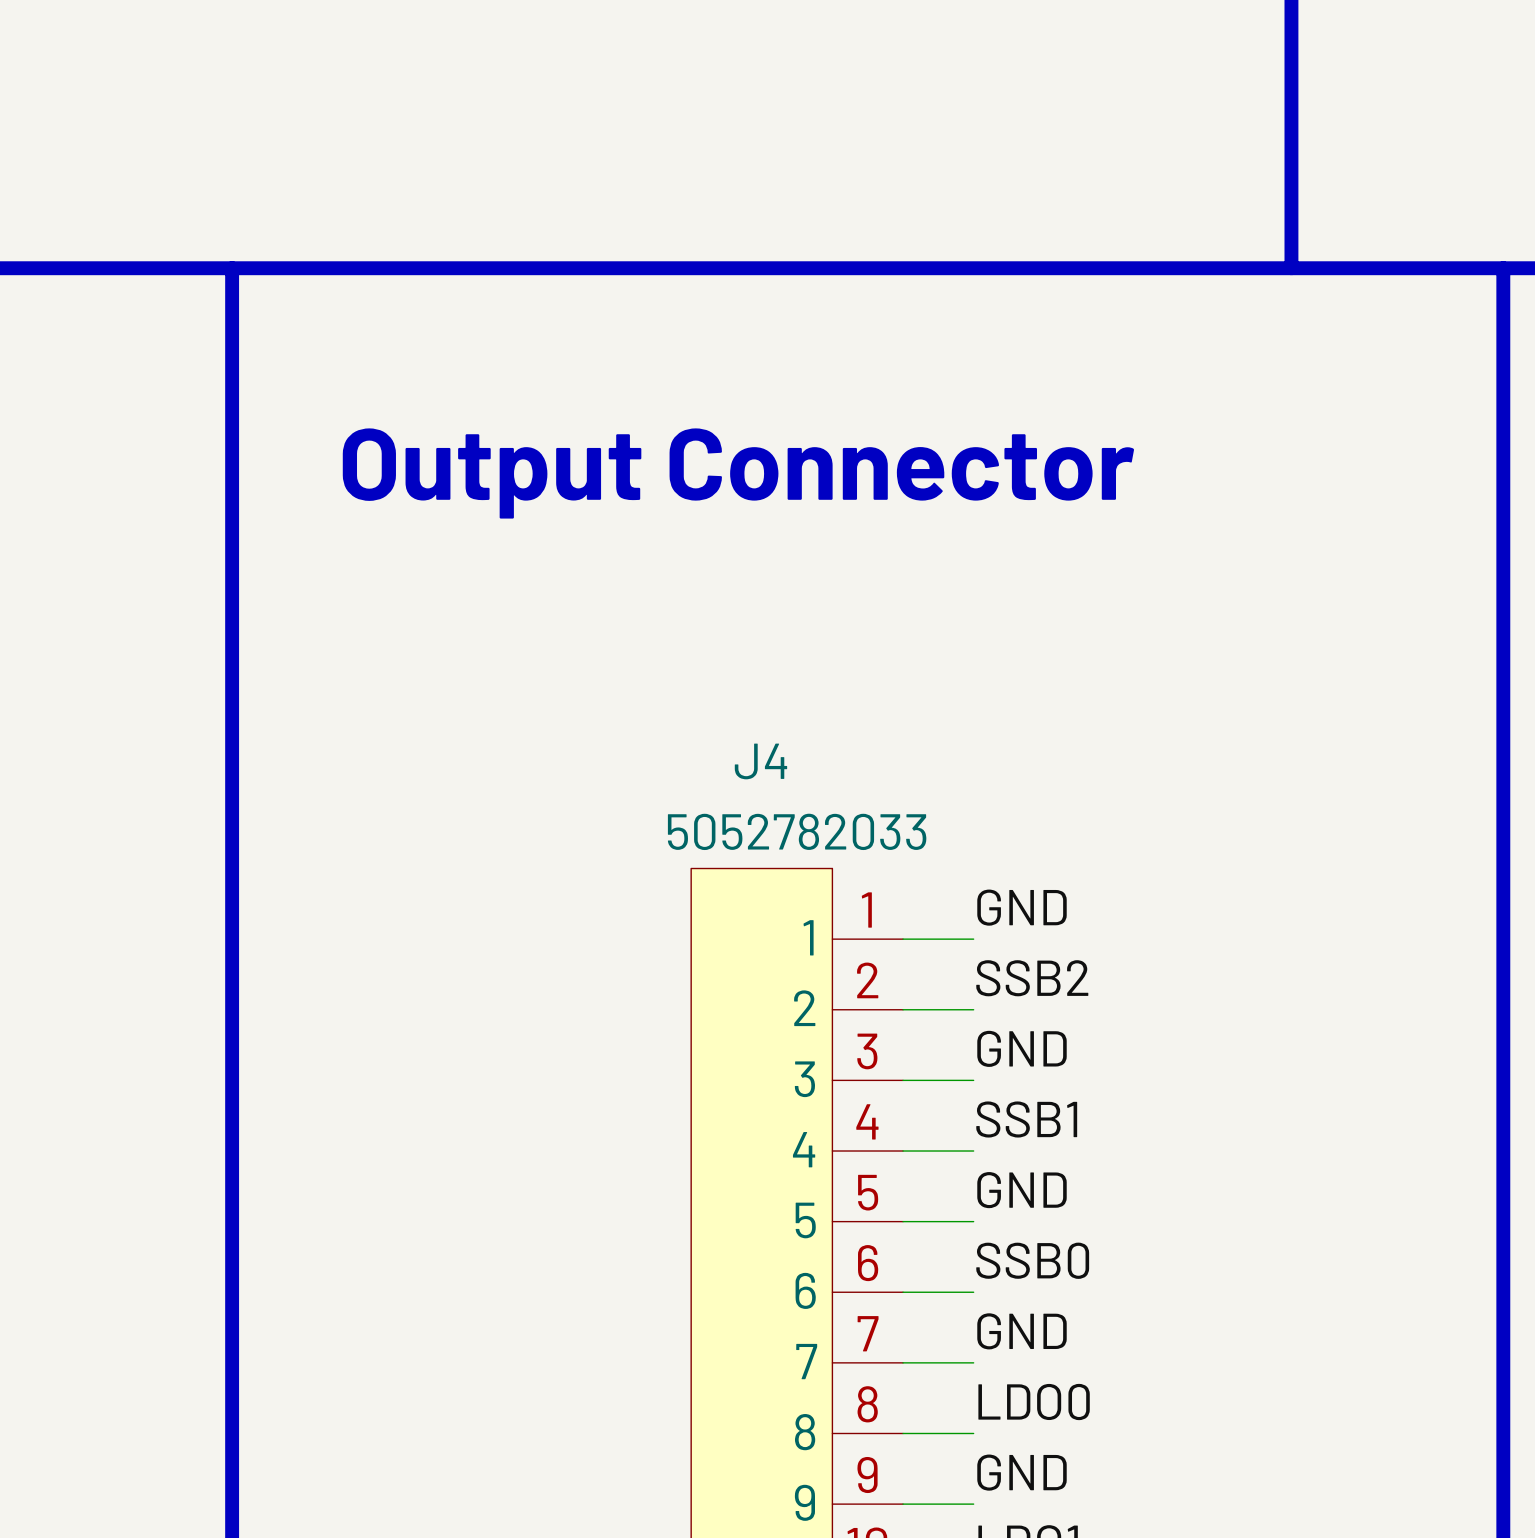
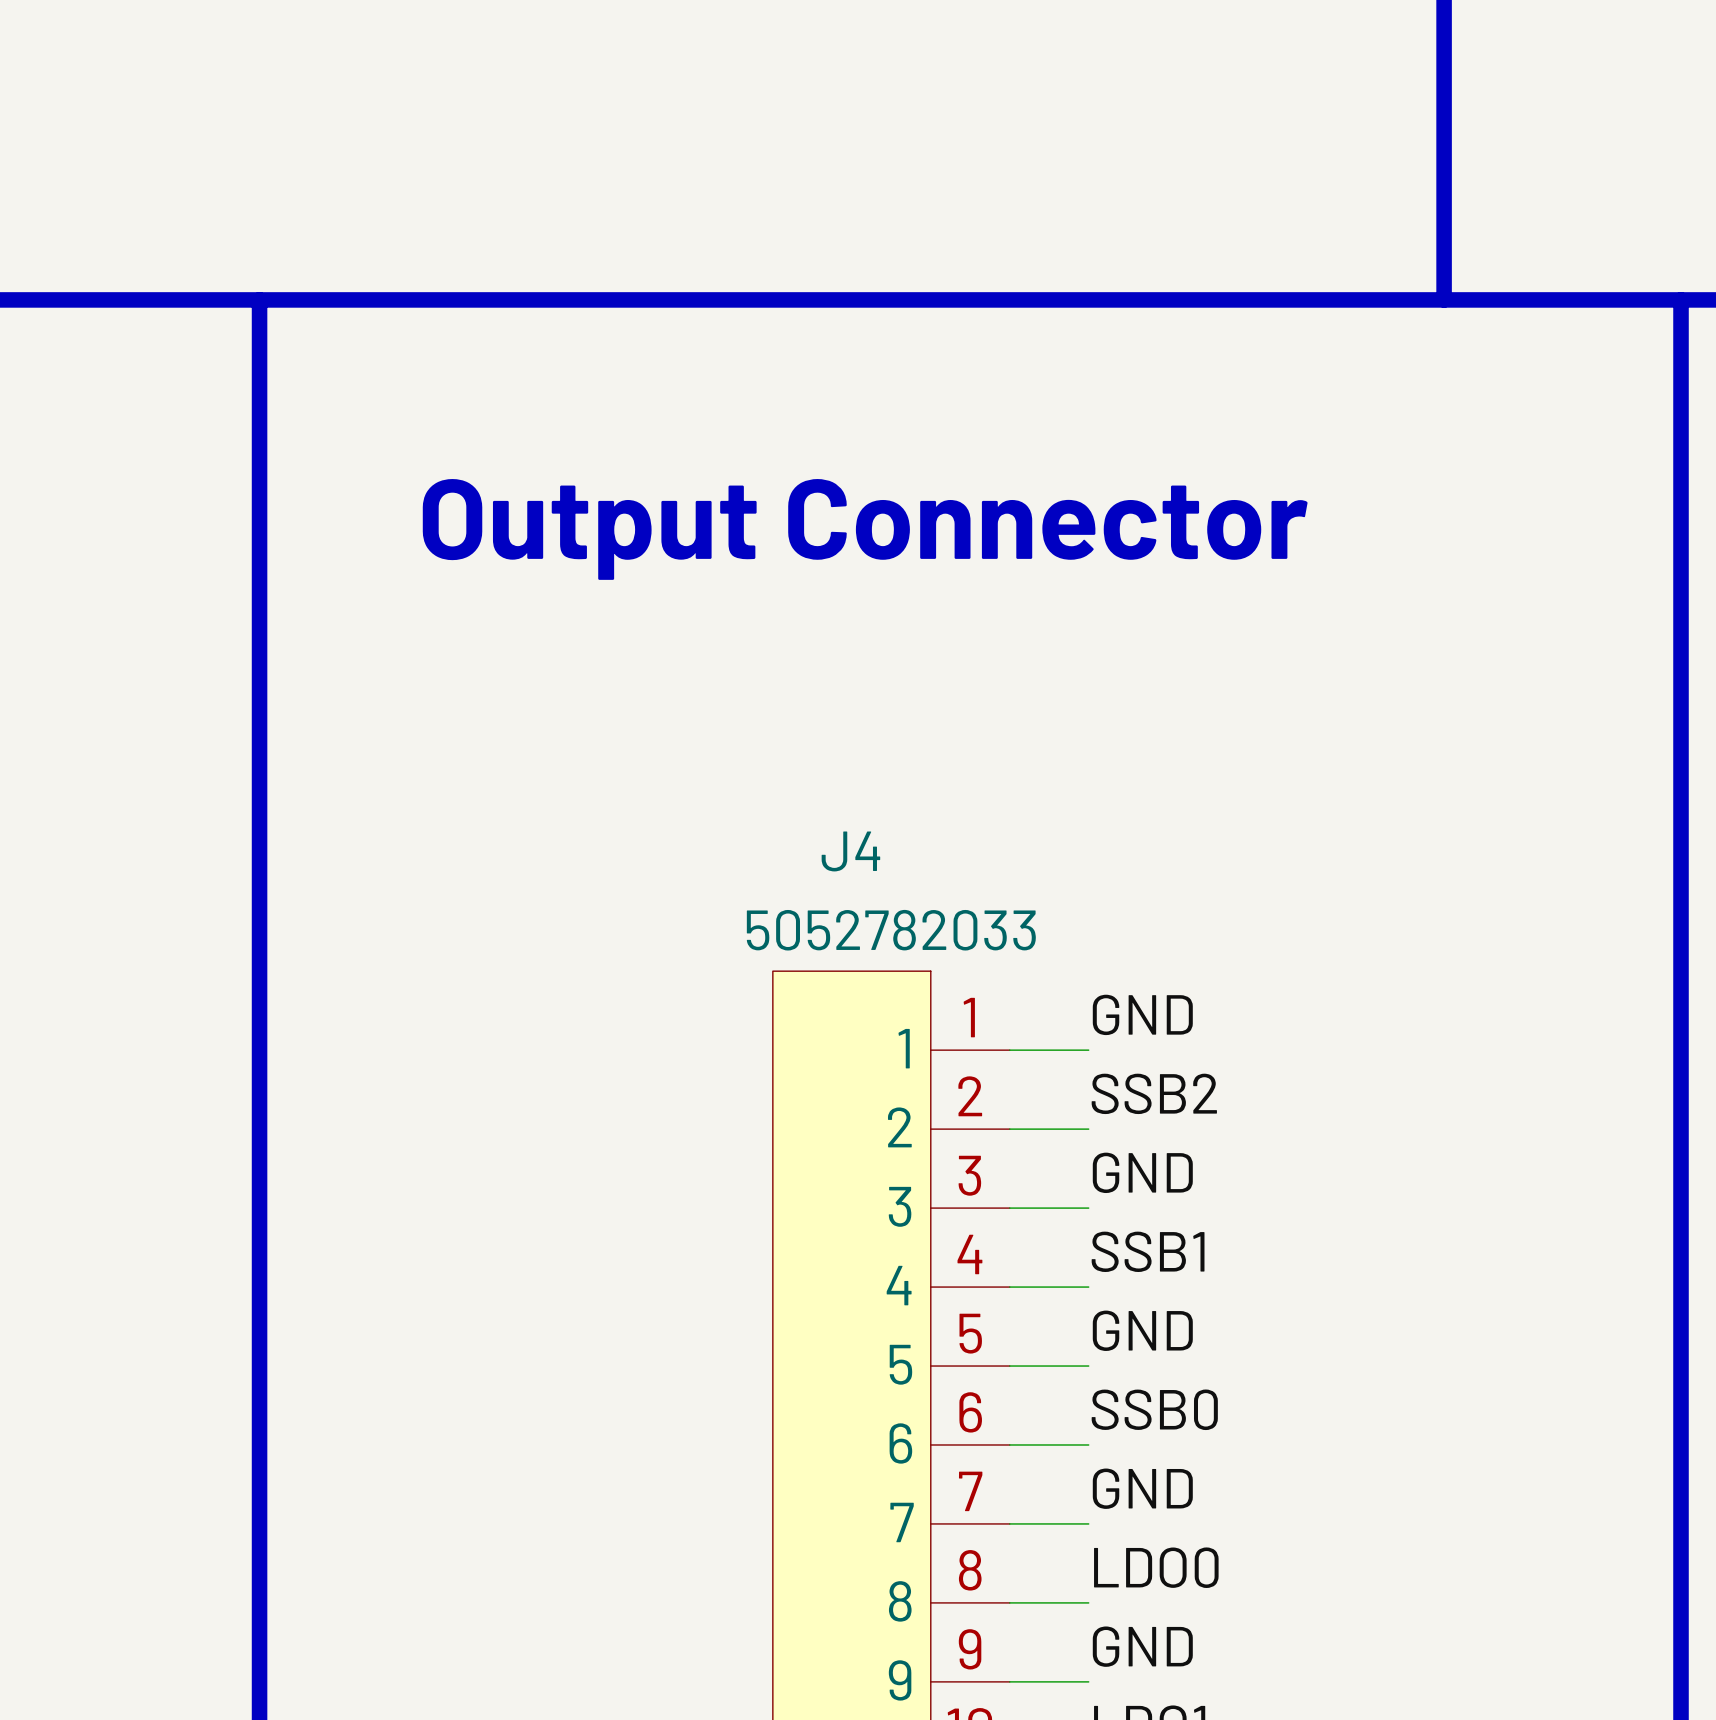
text position: Output Connector (738, 473) -> Output Connector (865, 529)

